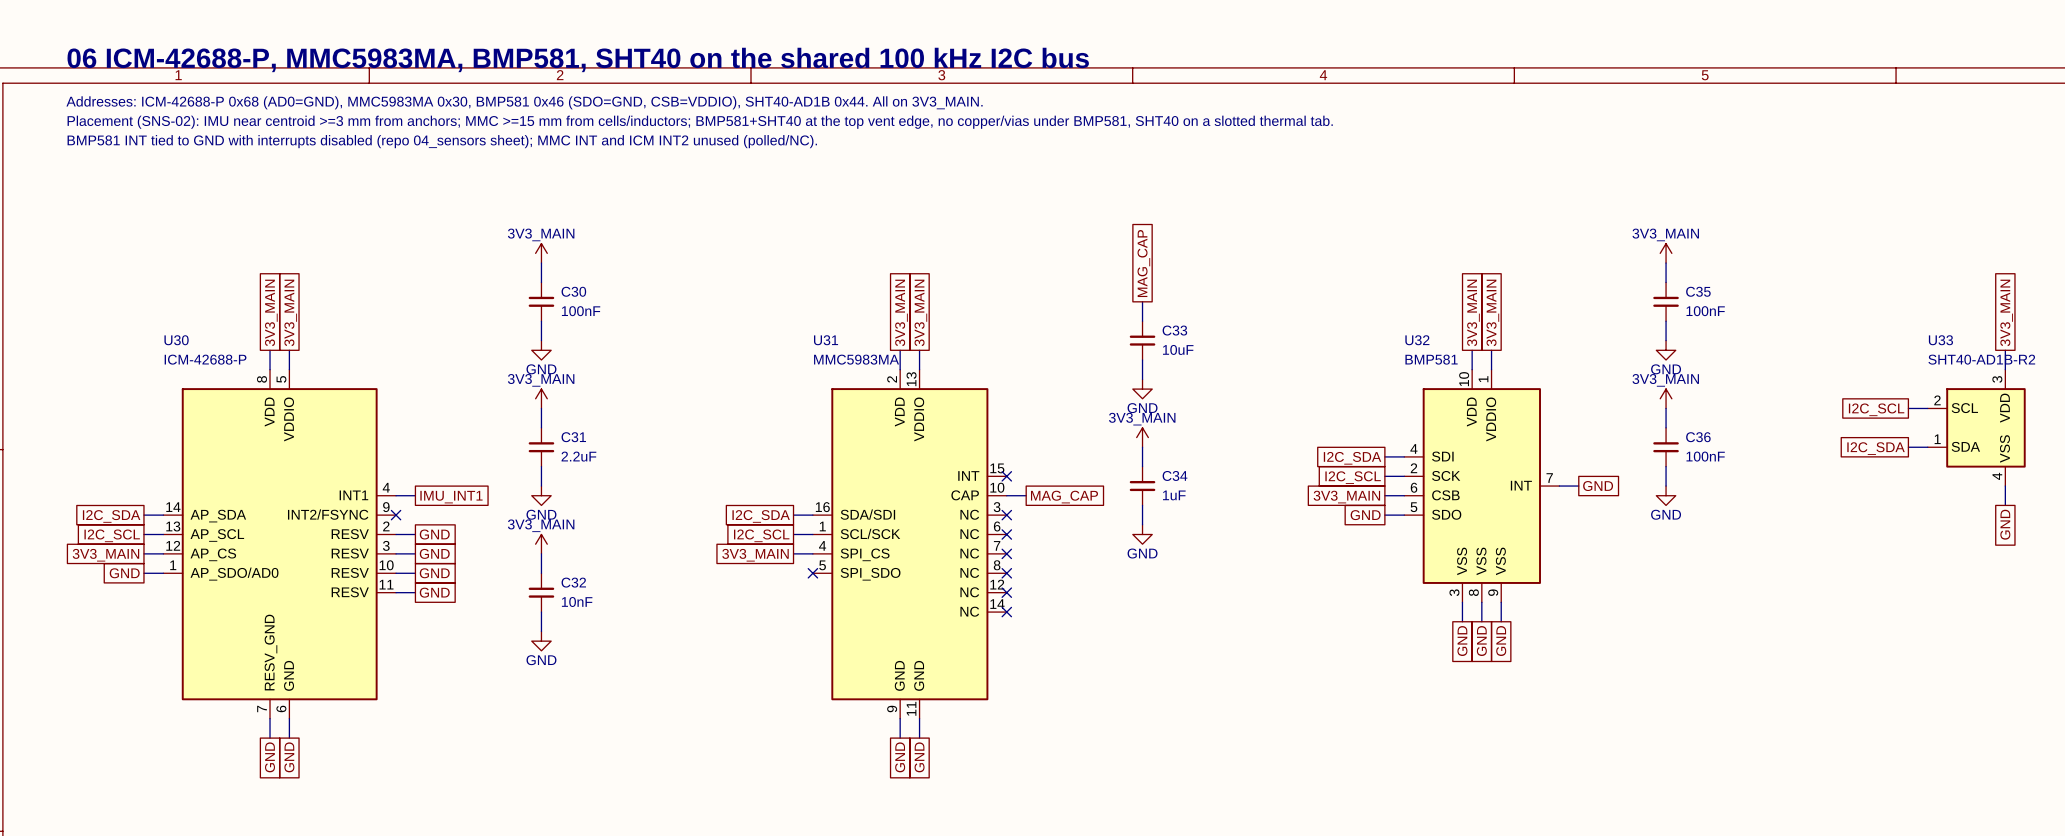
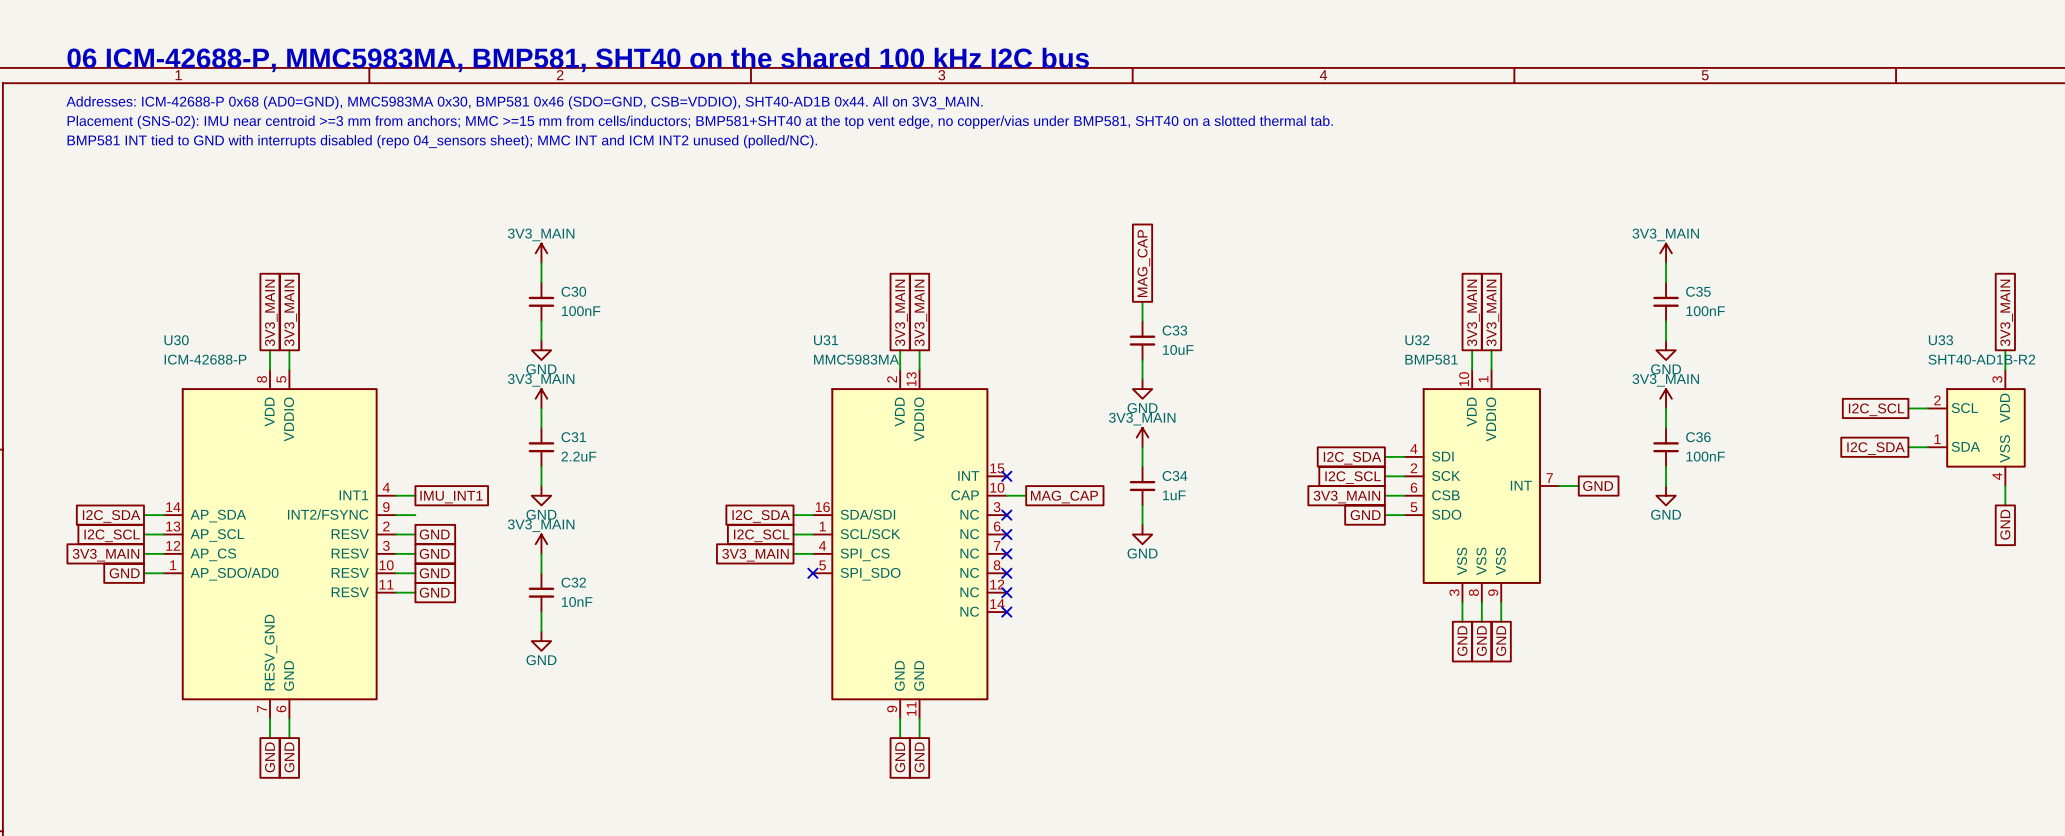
wire: none -> (396, 515) (415, 515)
no-connect mark: (396, 515) -> none

